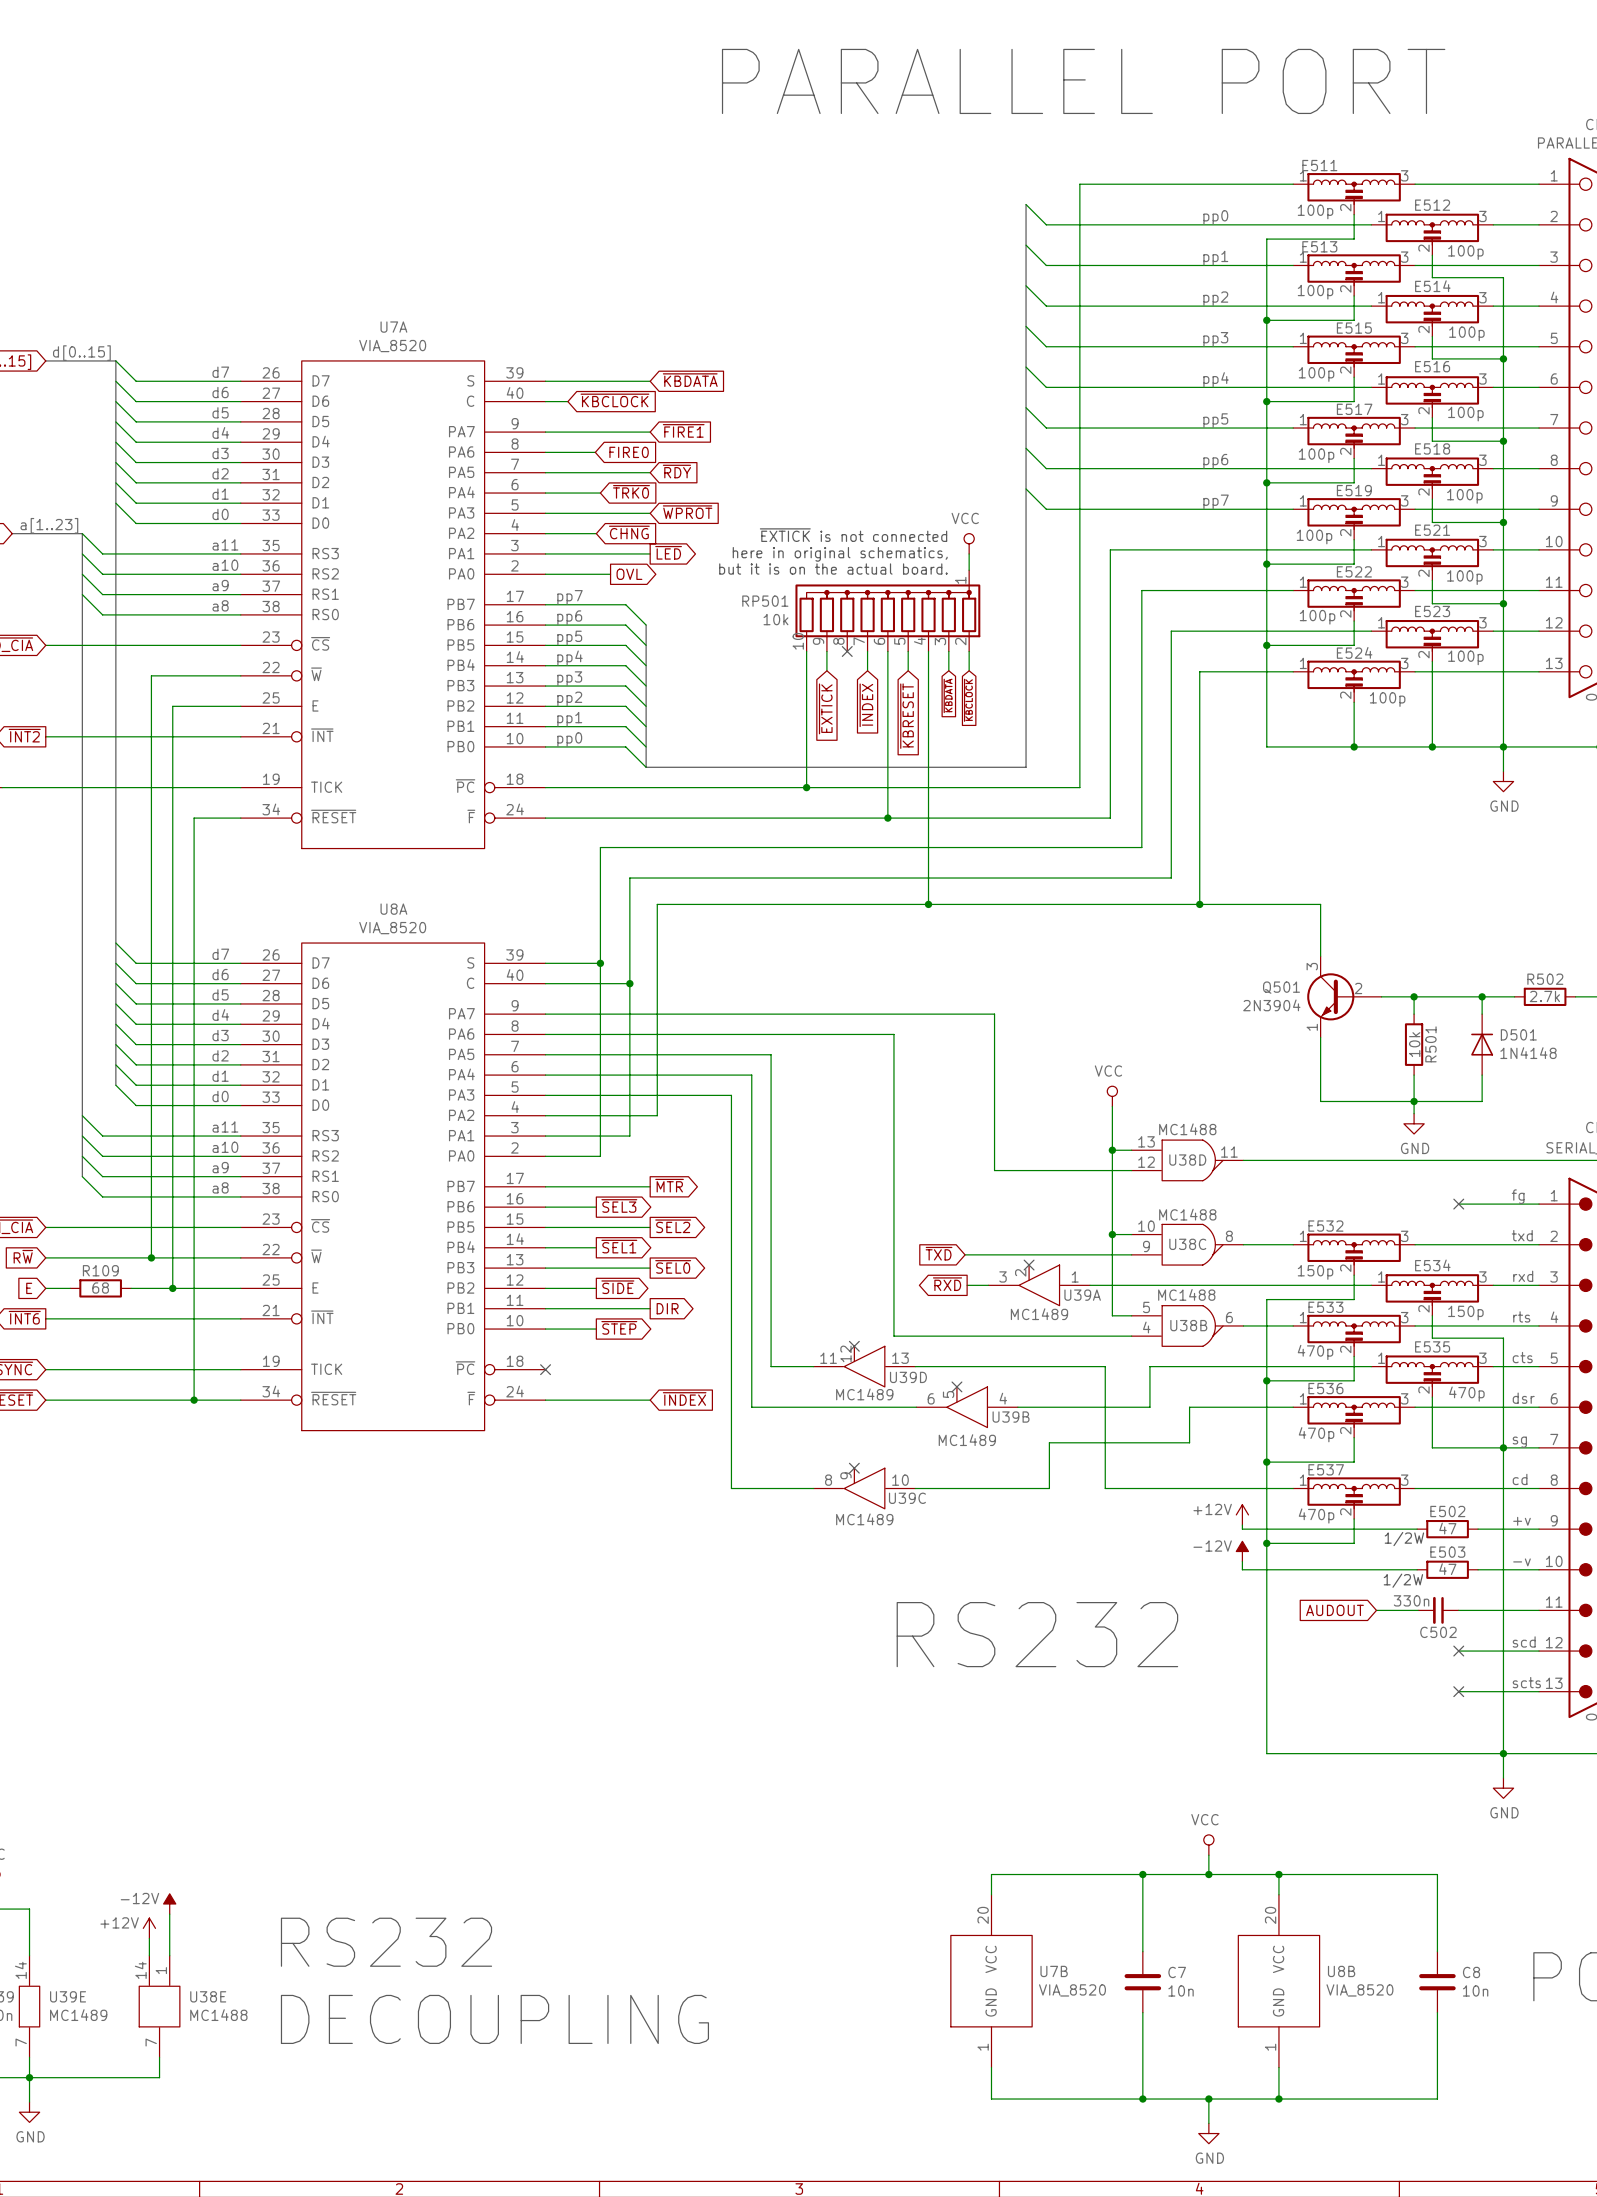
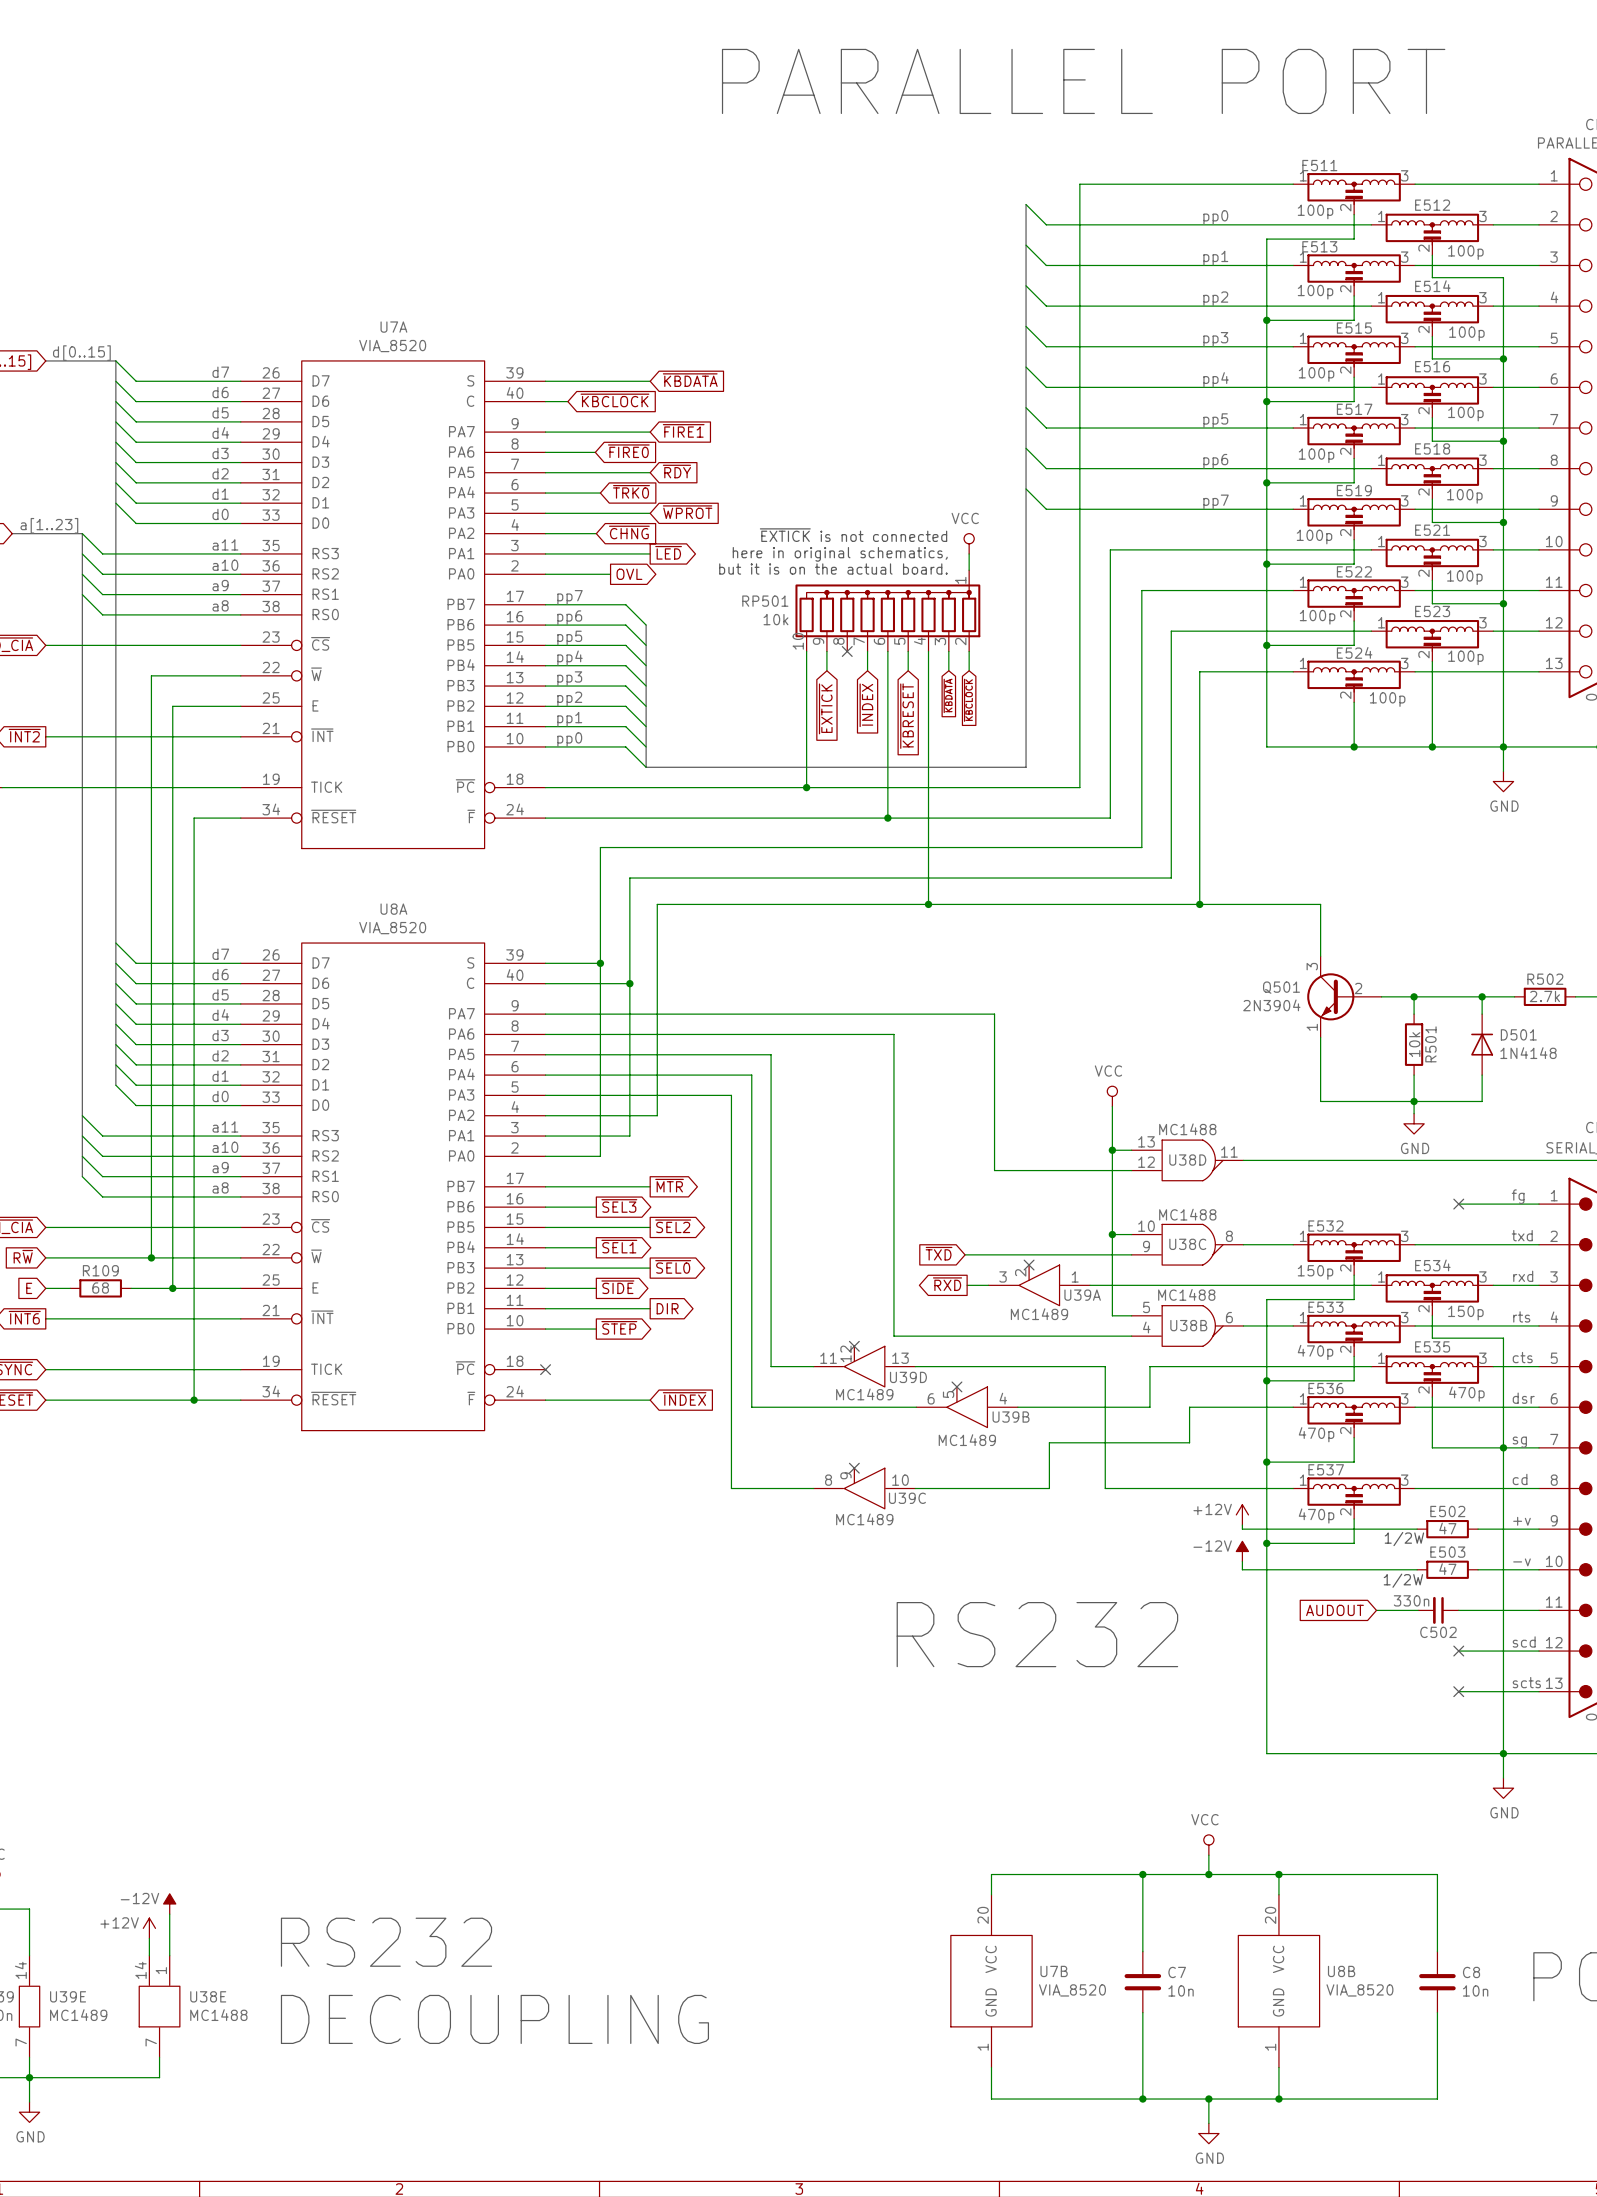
global label: FIRE0 (629, 452) -> ~{FIRE0} (628, 451)

